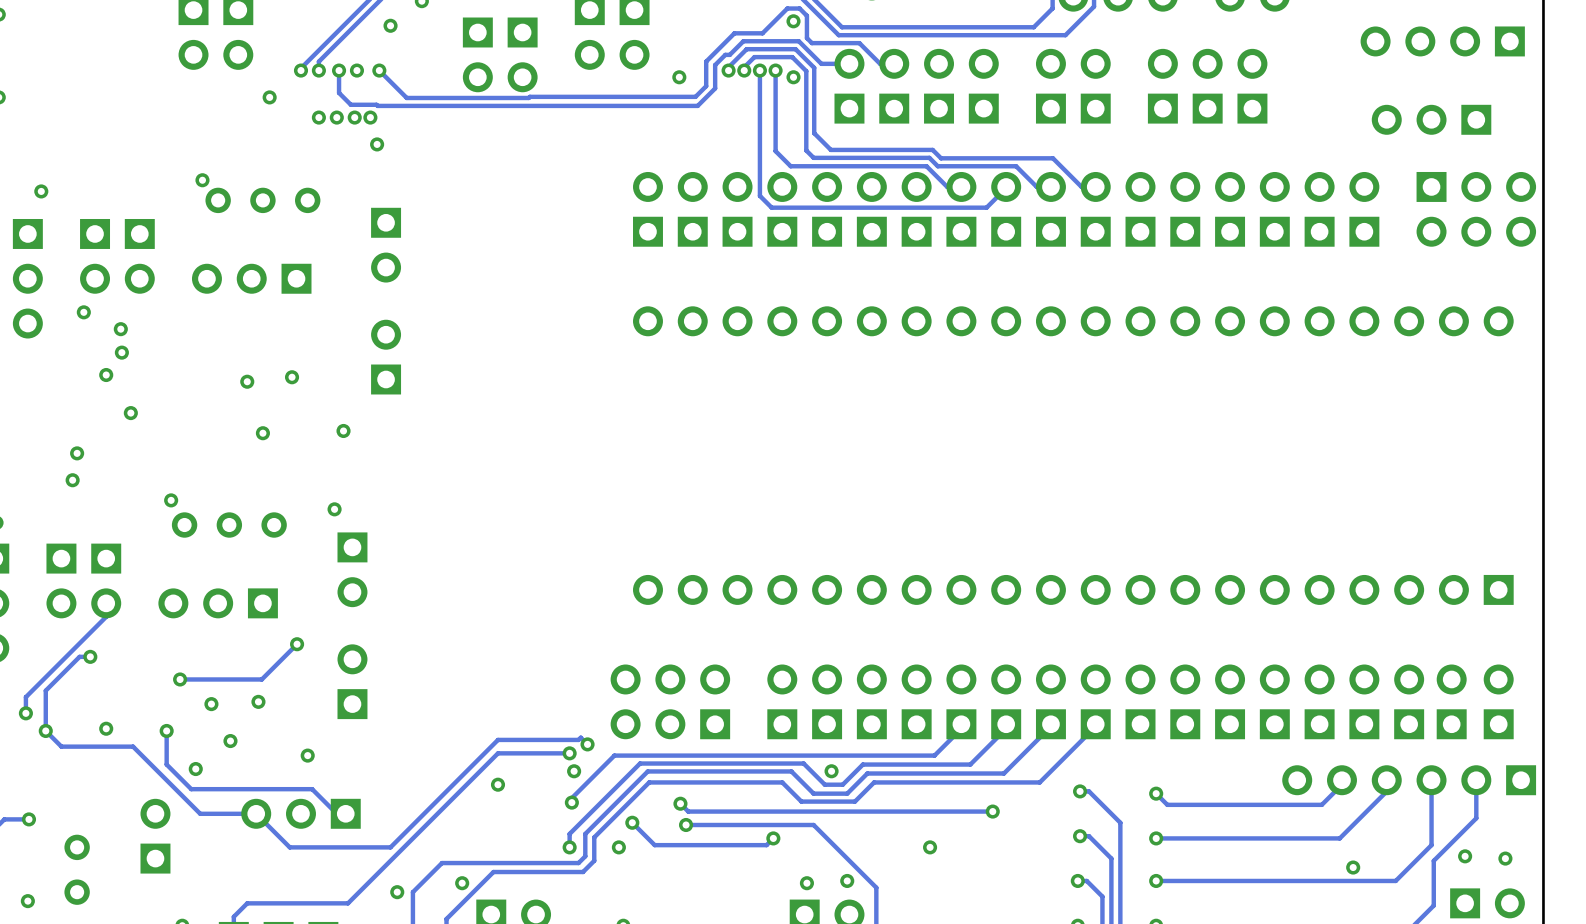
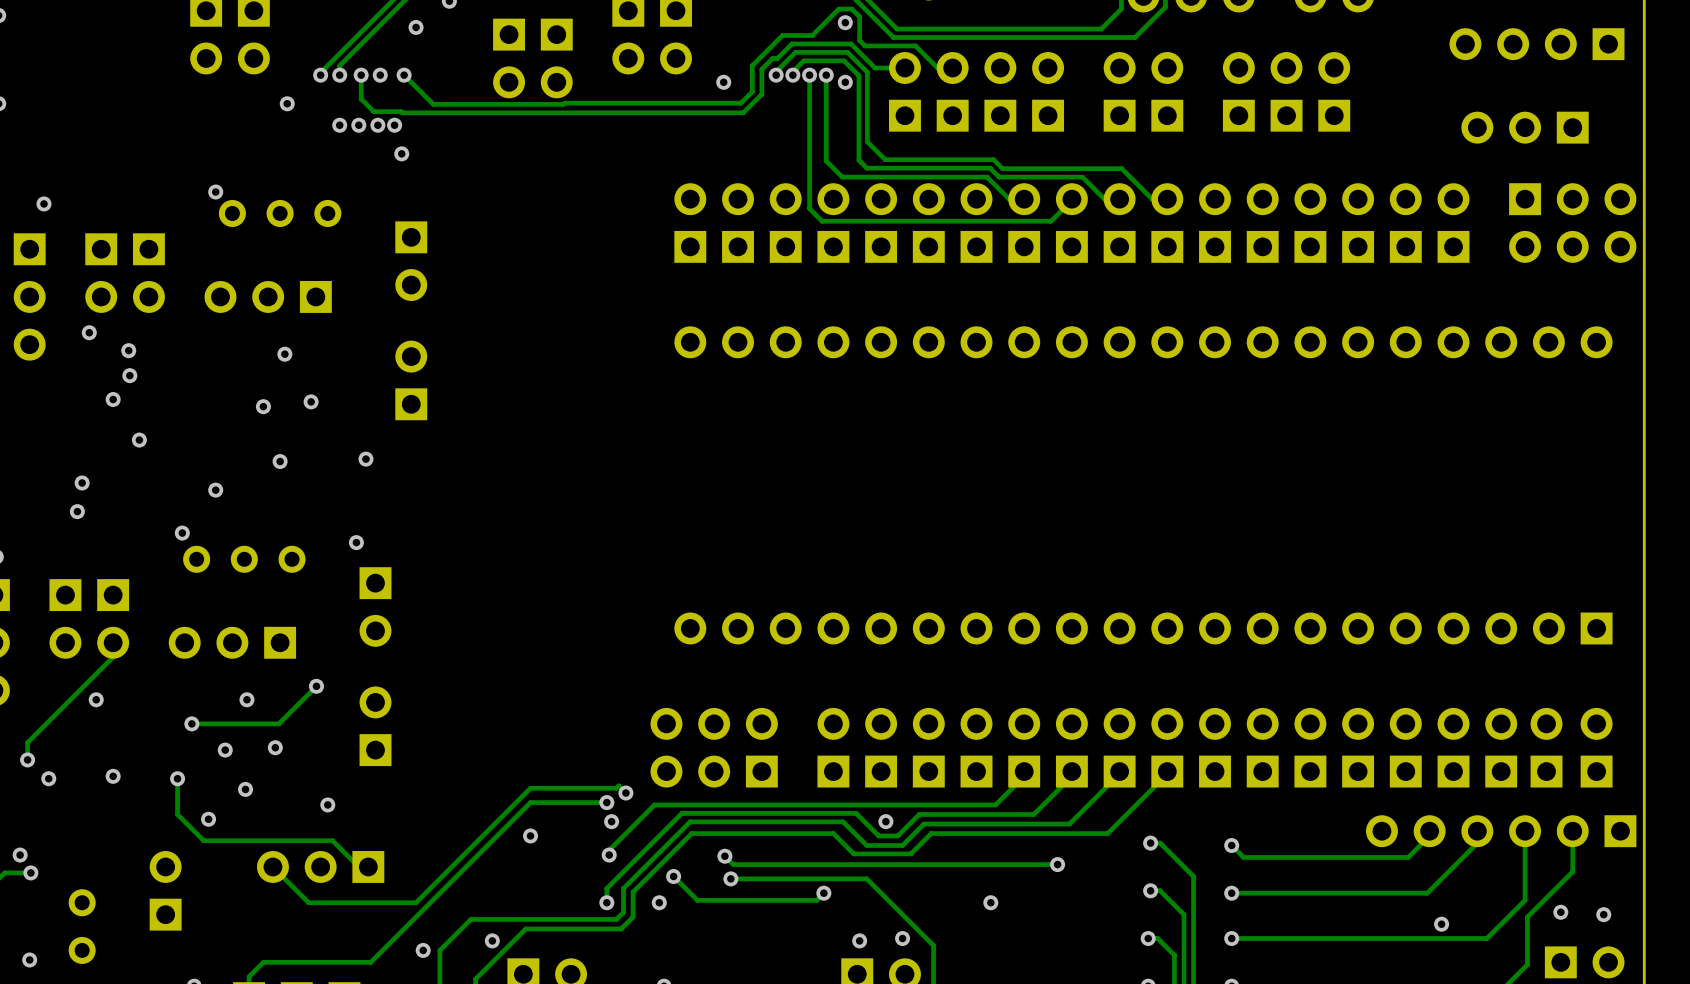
via: none -> (284, 354)
via: none -> (215, 490)
track: (90, 656) (79, 656) (45, 690) (45, 730) (61, 746) (133, 746) (200, 813) (256, 813) -> none
via: none -> (246, 699)
via: none -> (20, 855)

